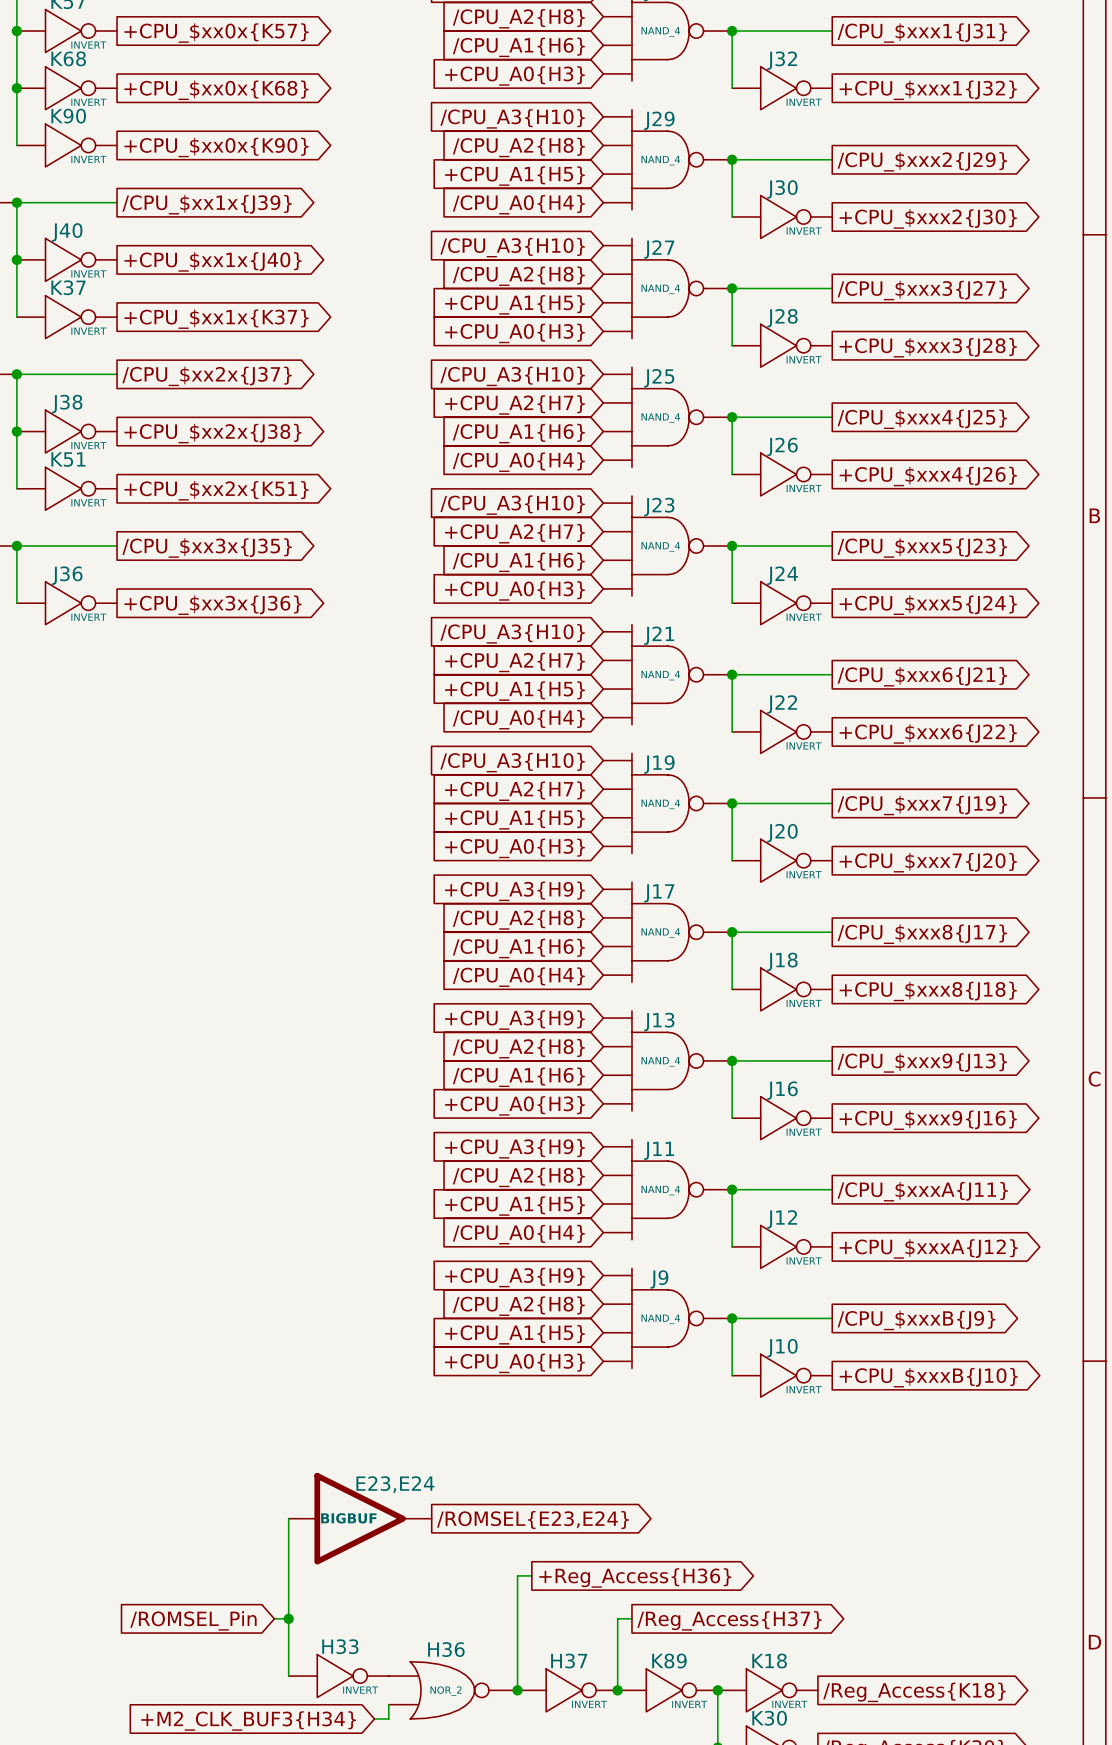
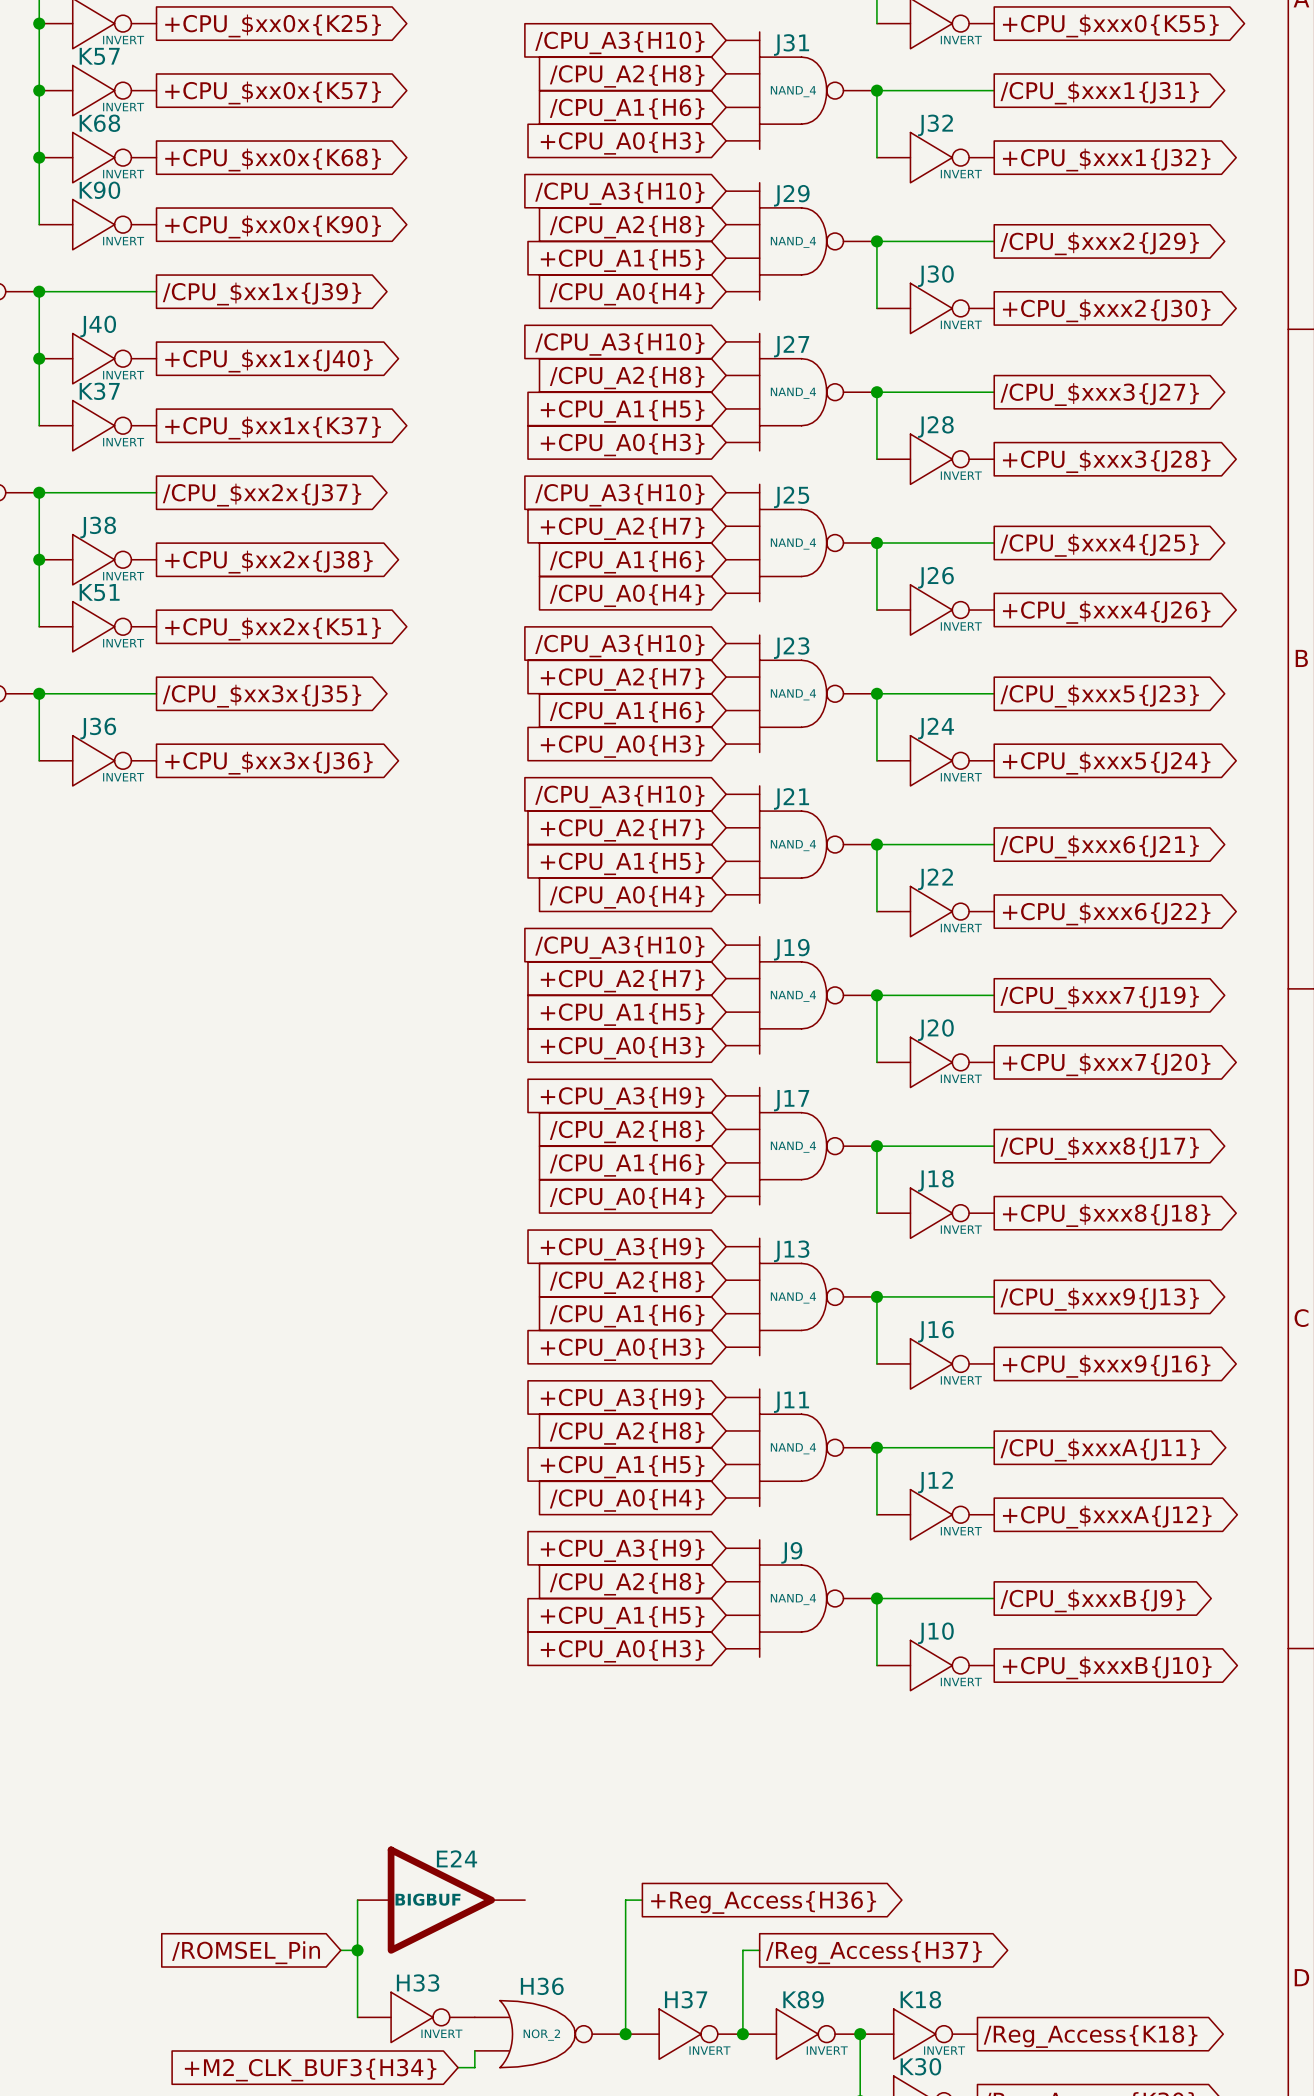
wire: (288, 1518) (288, 1575) -> none
E23,E24: BIGBUF (360, 1518) -> none
global label: /ROMSEL{E23,E24} (533, 1520) -> none
E24: none -> BIGBUF (441, 1900)

